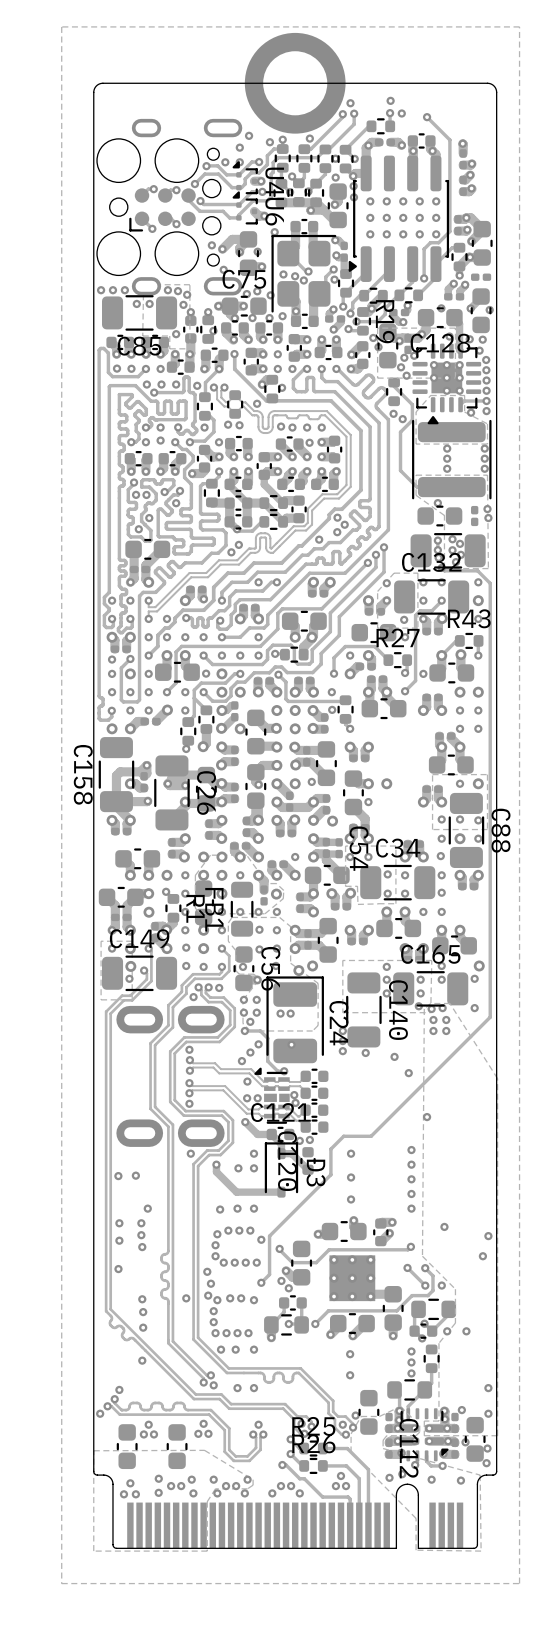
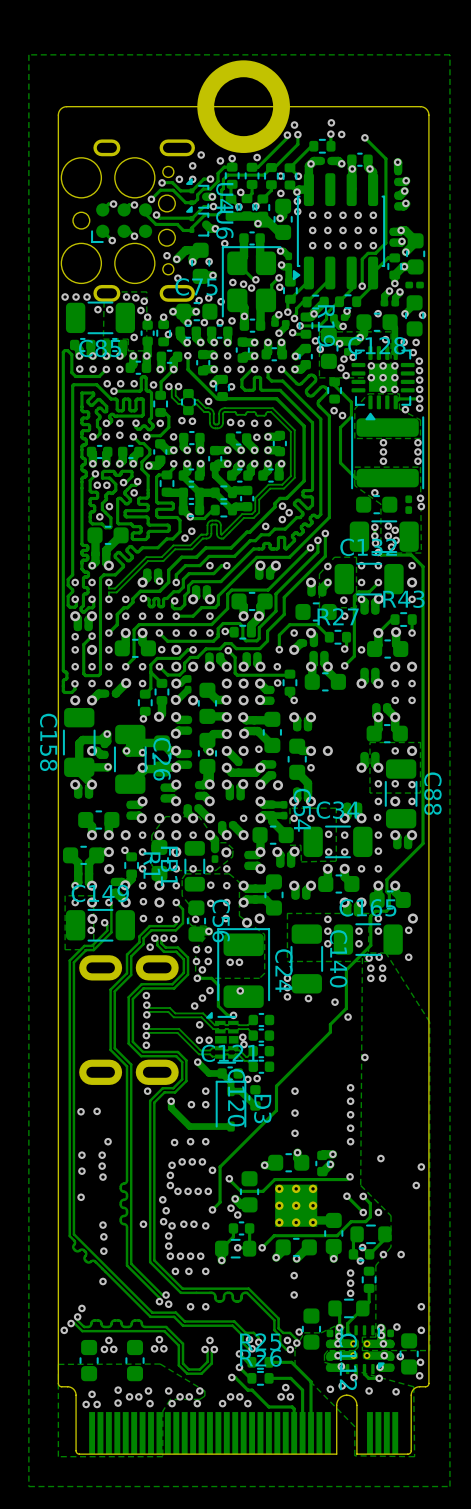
track: (490, 884) (490, 1017) (371, 1136) (343, 1136) (330, 1149) -> (423, 843) (386, 879) (389, 908) (386, 911) (375, 911) (370, 916) (370, 945) (346, 969) (346, 1008) (330, 1024) (330, 1032) (276, 1086)
via: (418, 1006) -> none

